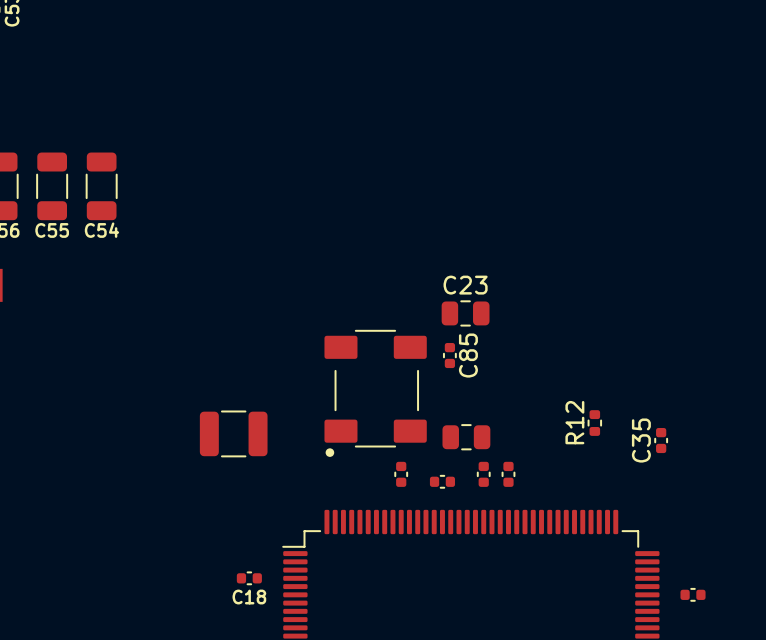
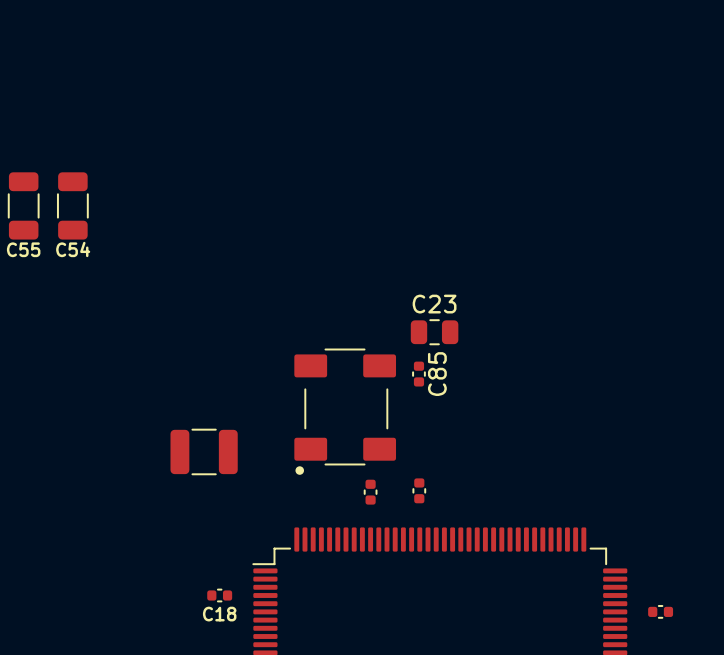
R12: (594, 423) -> none
part: (466, 437) -> none
C35: (661, 440) -> none
part: (483, 474) -> none
part: (508, 474) -> none
part rotation: 0° (442, 481) -> 90° clockwise (419, 490)

